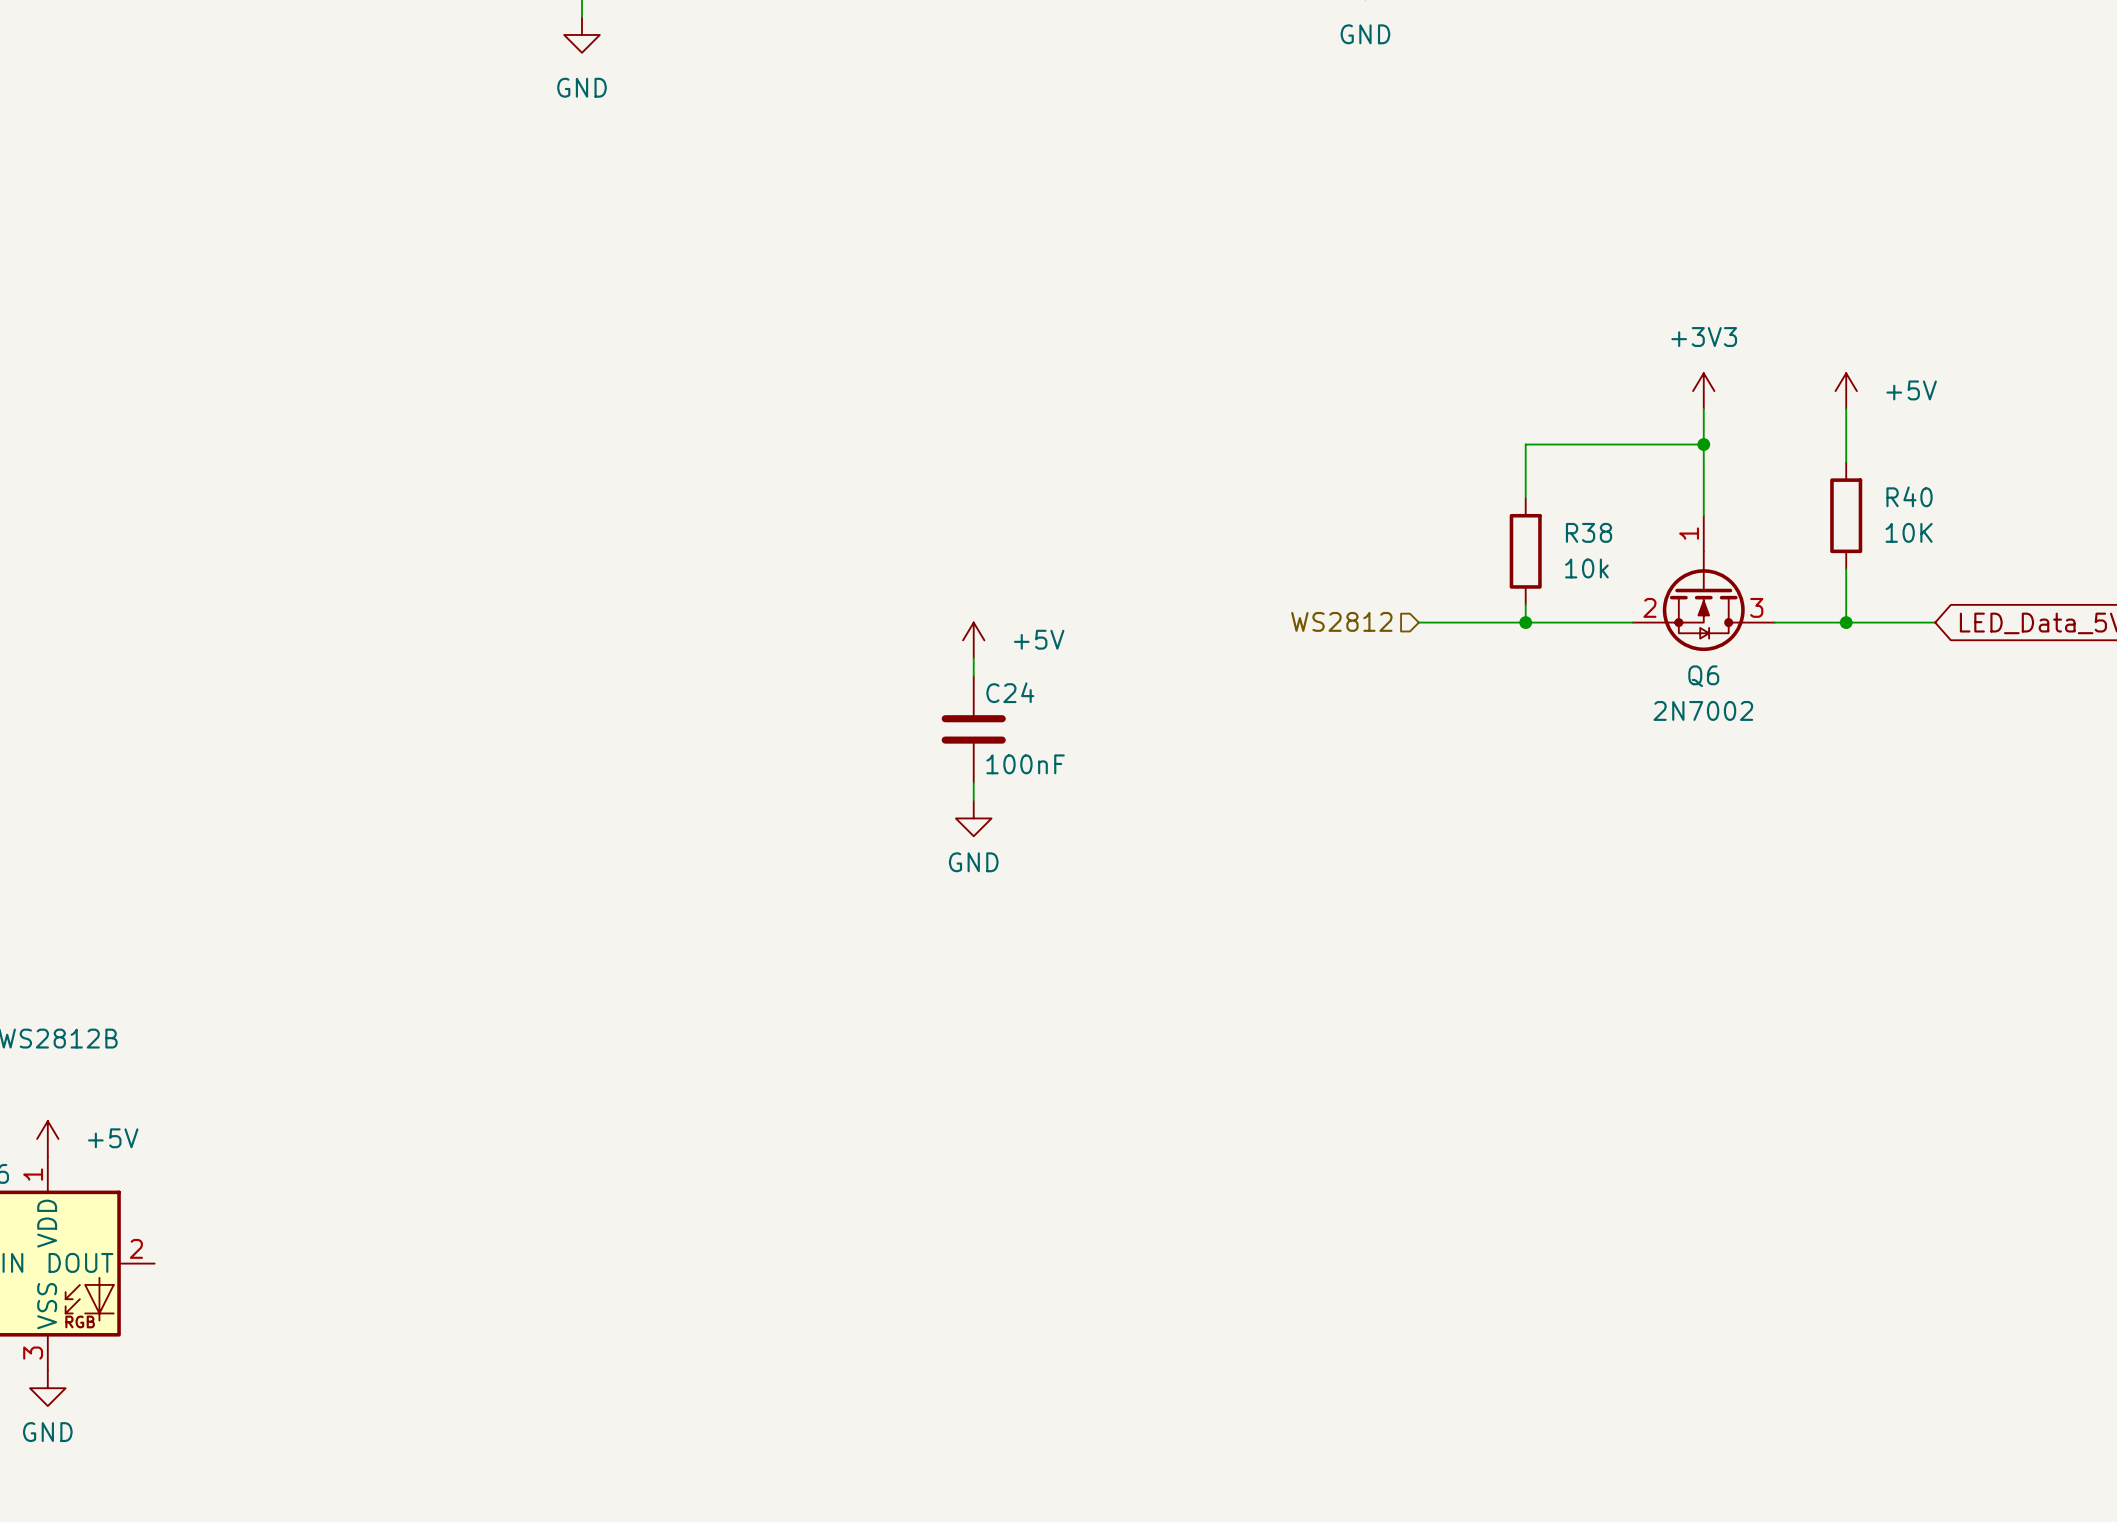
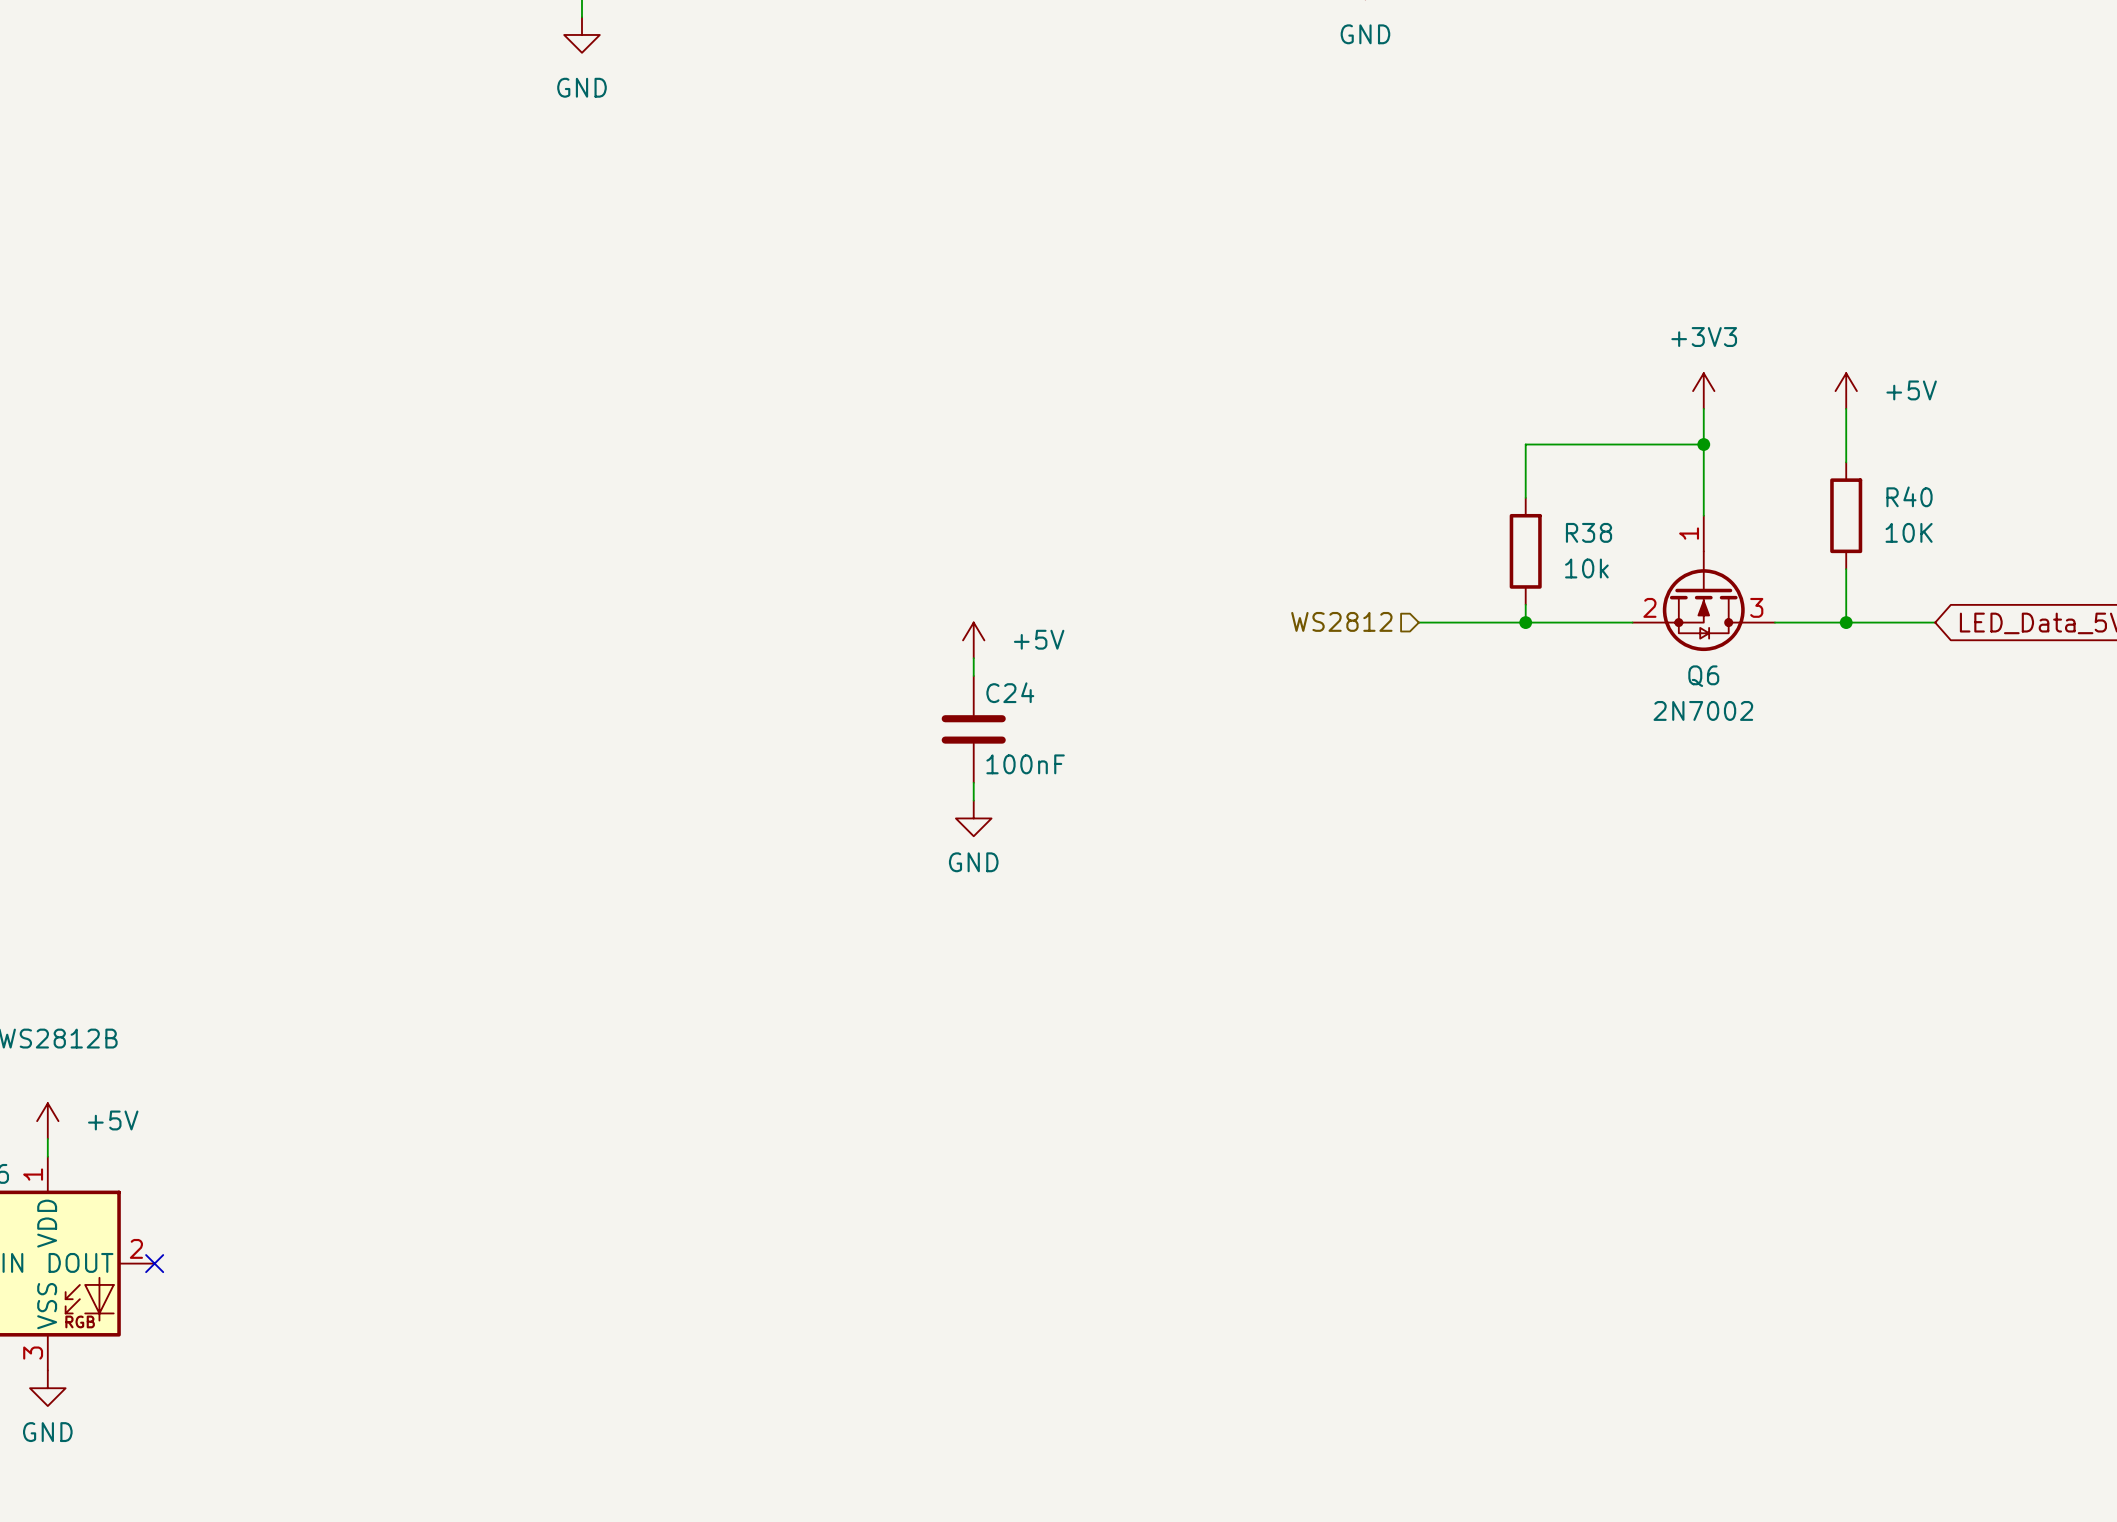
power symbol position: +5V (47, 1138) -> +5V (47, 1121)
no-connect mark: none -> (154, 1263)

